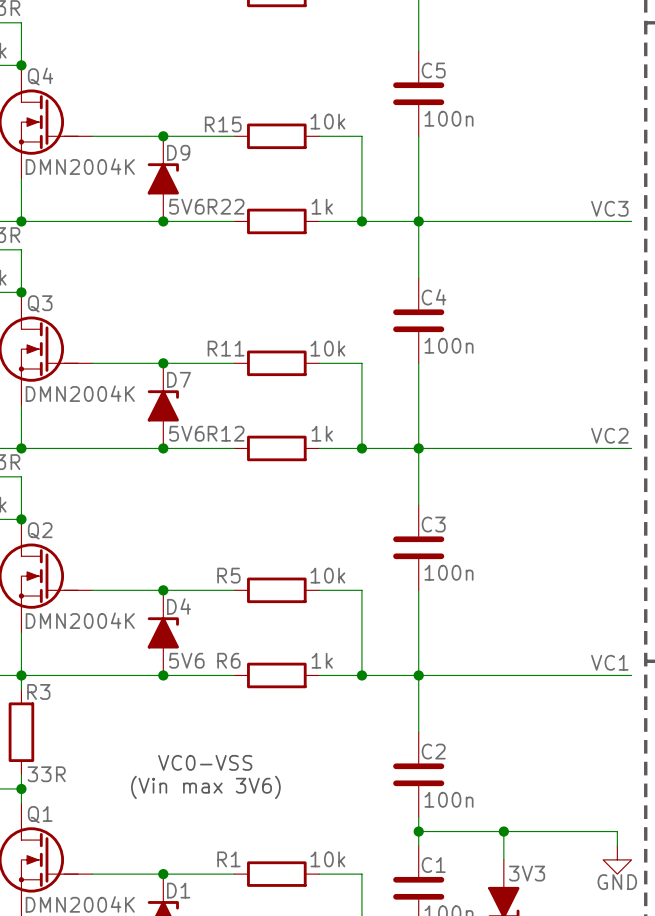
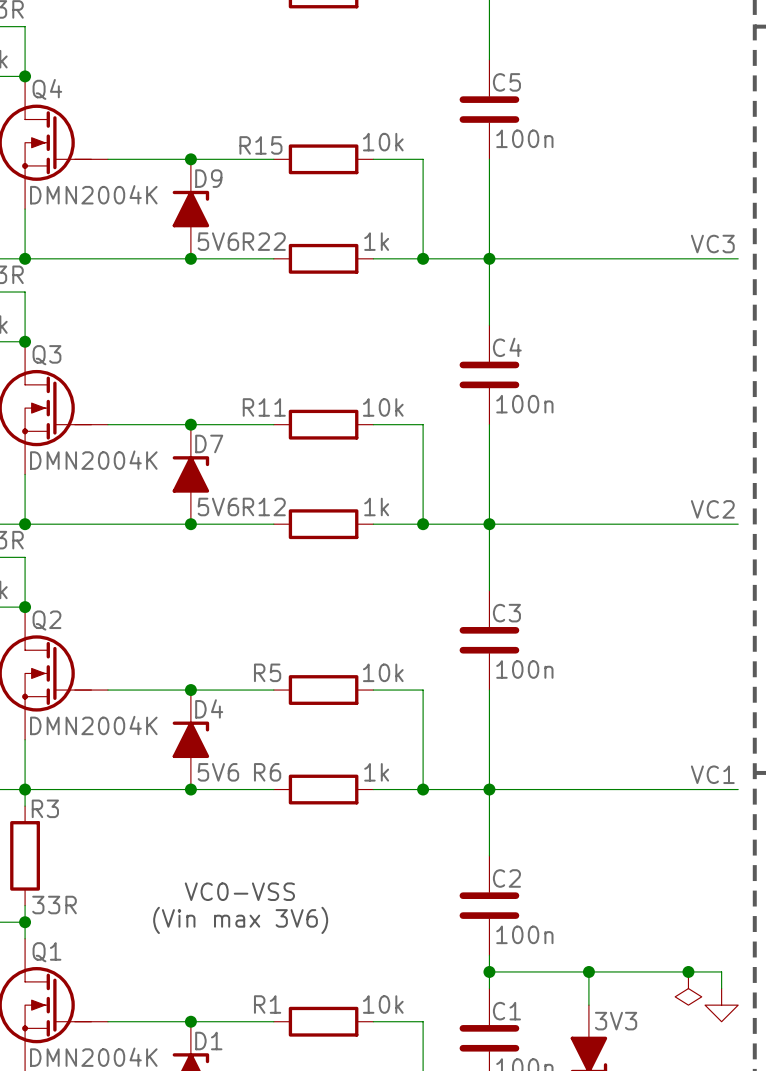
junction: none -> (688, 971)
power symbol: none -> (688, 988)
power symbol text: GND (617, 882) -> none

